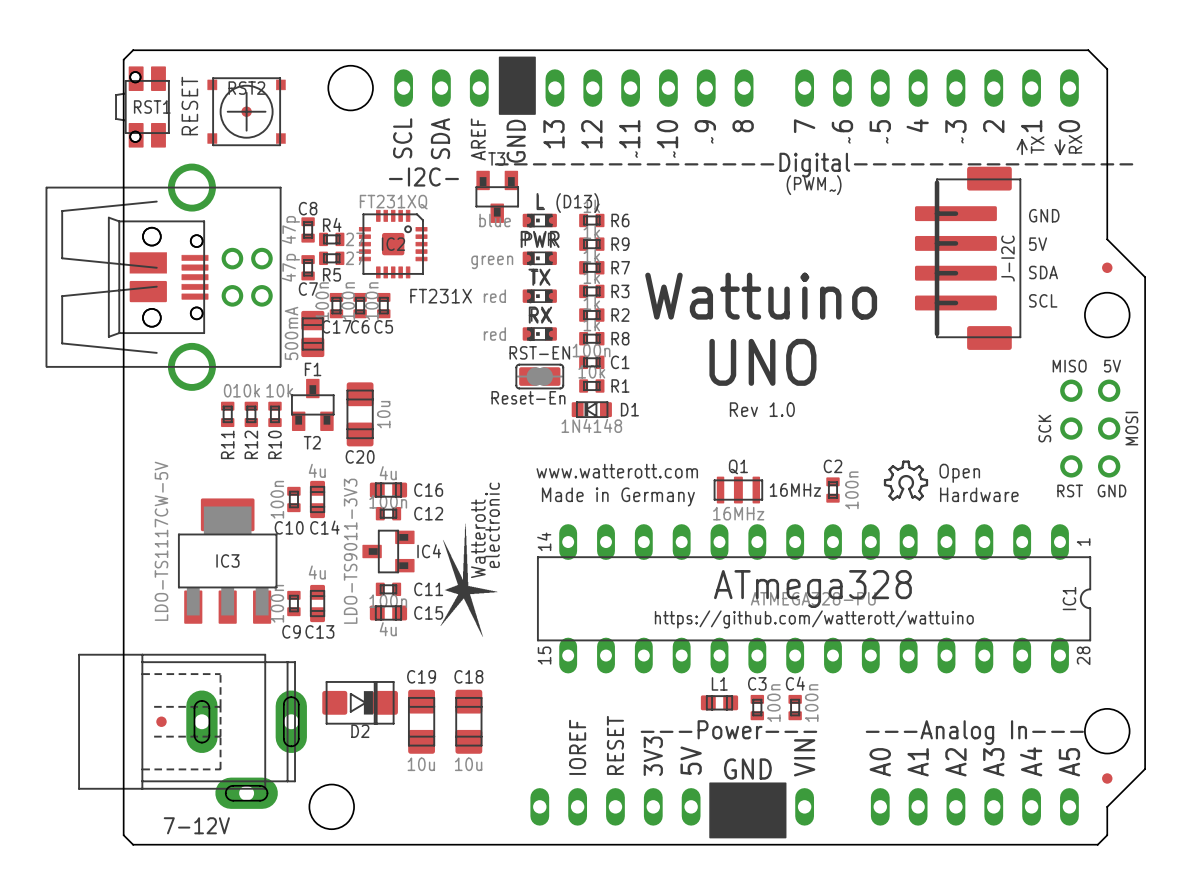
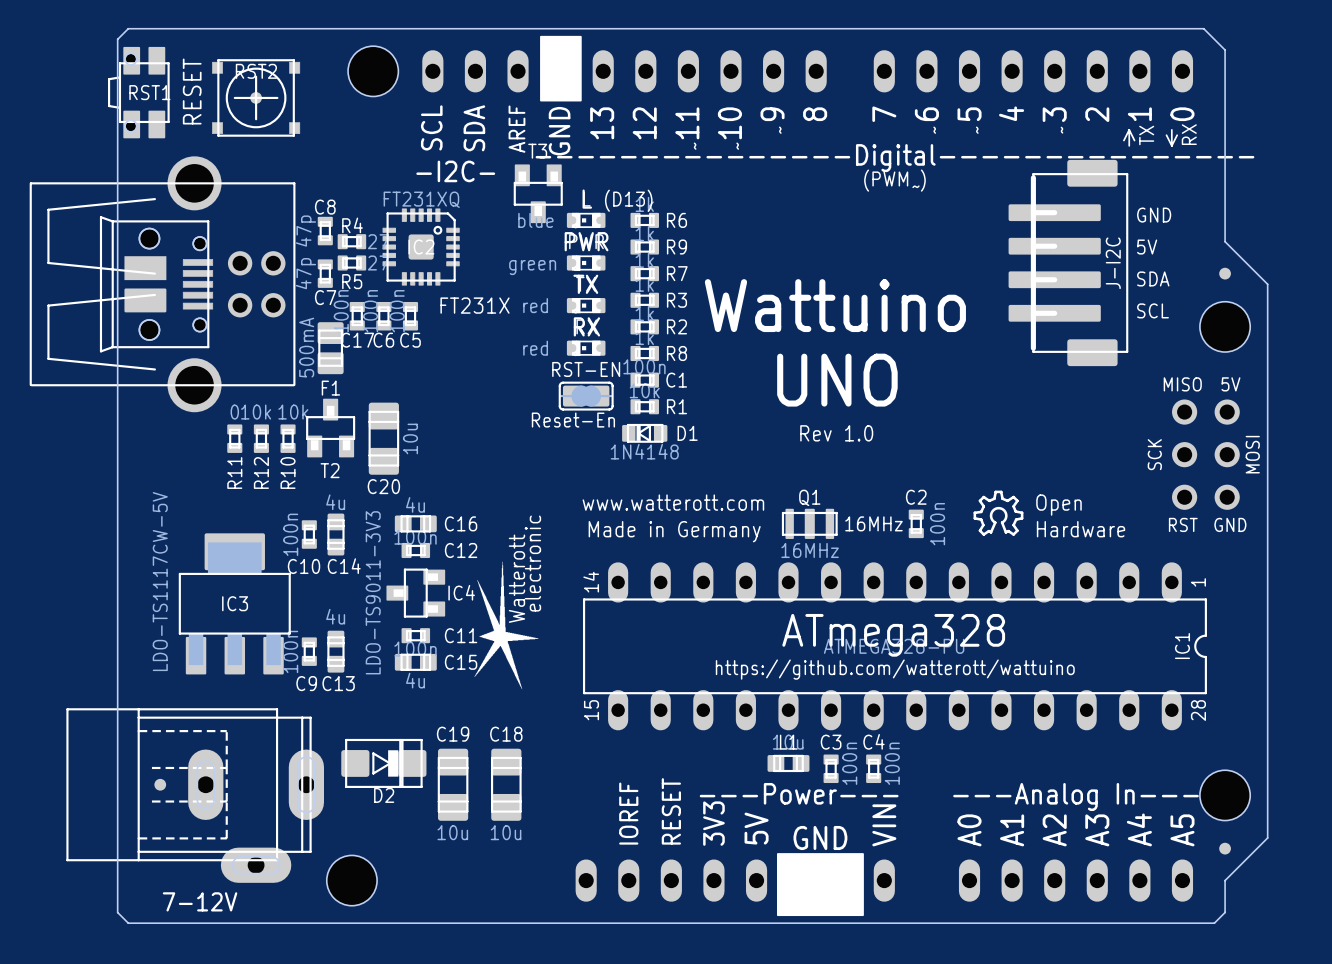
L1 value: none -> 10u (788, 742)

